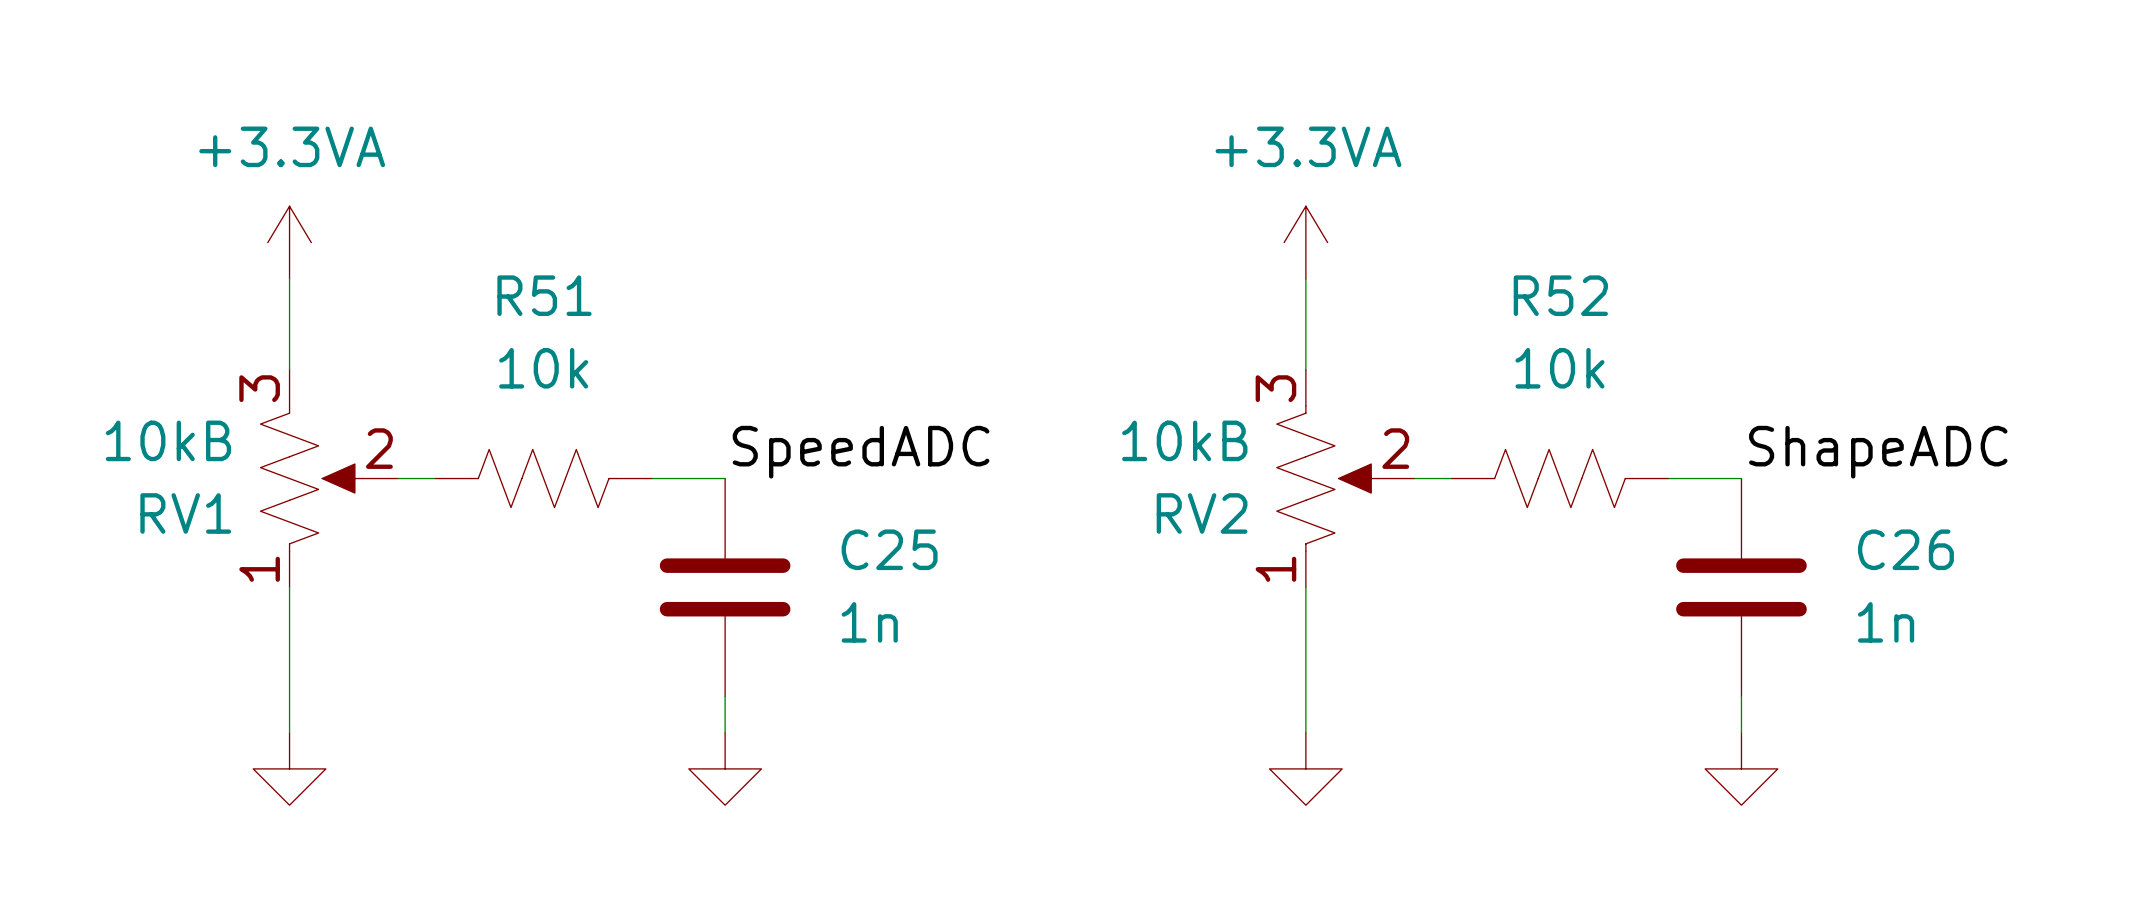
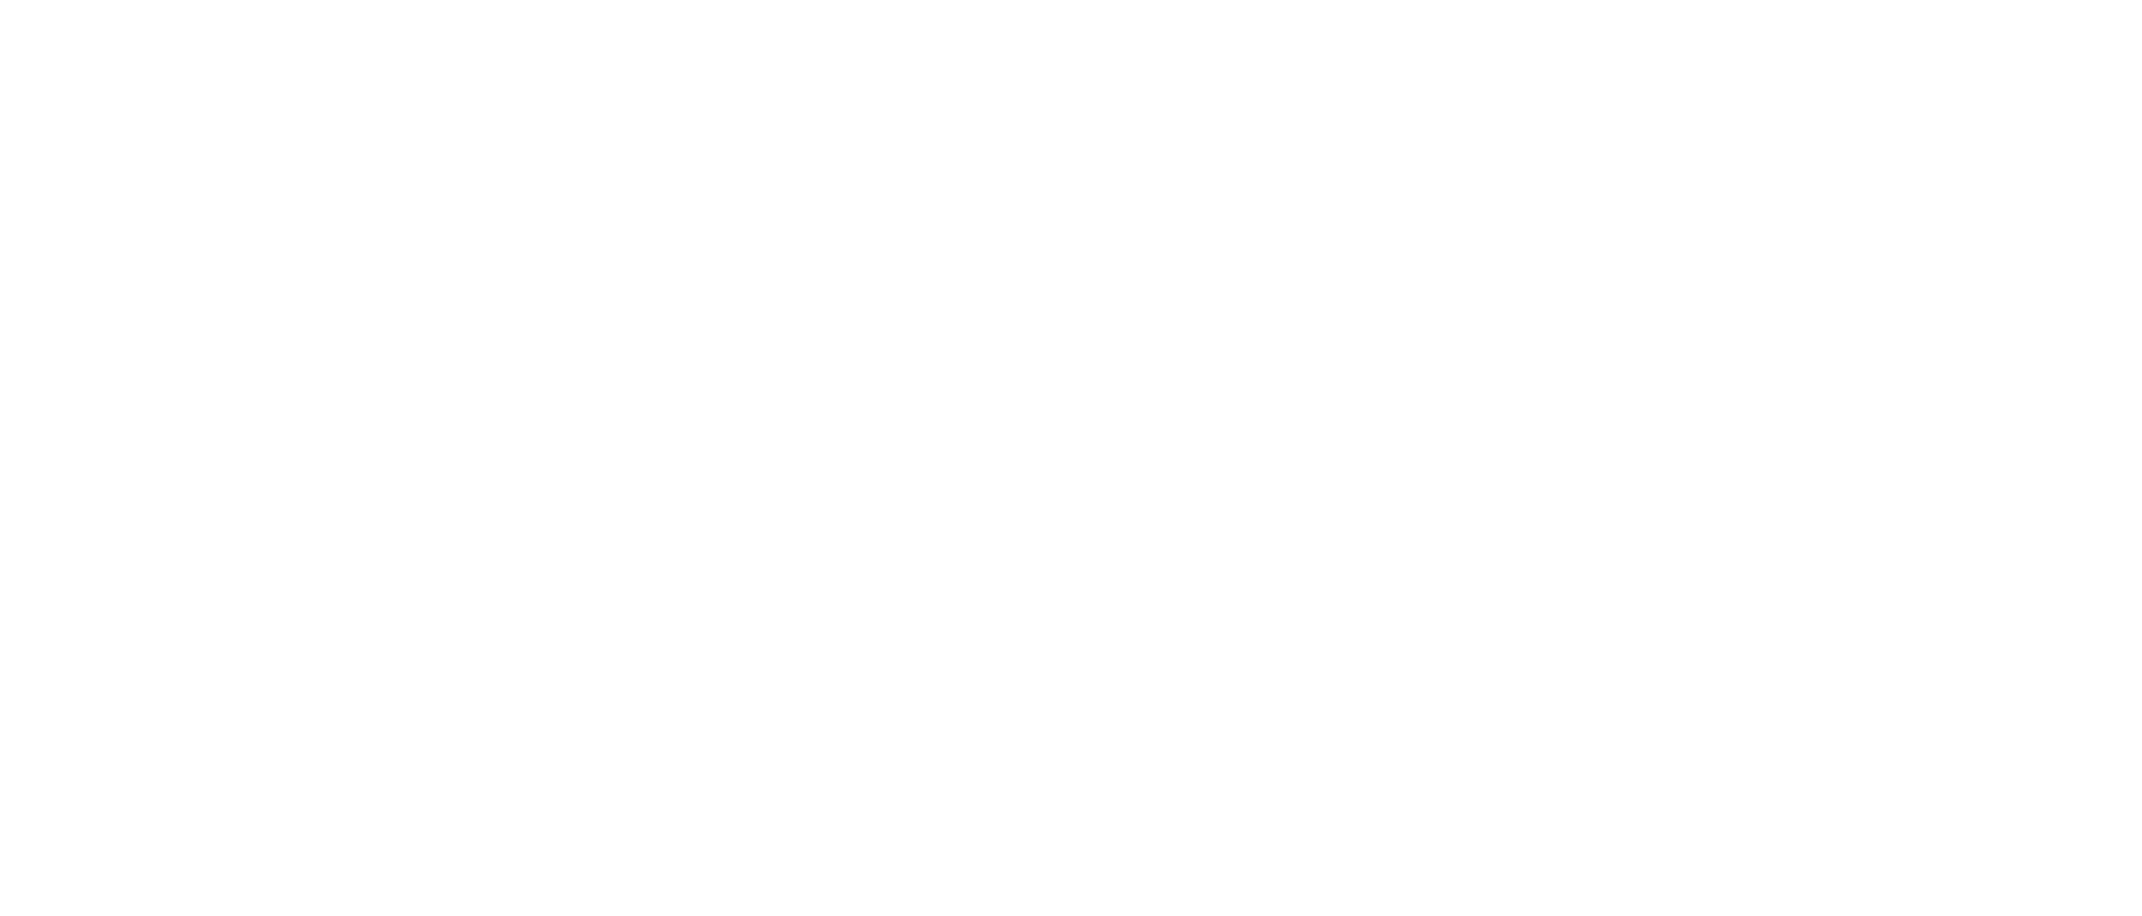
power symbol: +3.3VA (289, 242) -> none
power symbol: +3.3VA (1305, 242) -> none
wire: (289, 278) (289, 369) -> none
wire: (1305, 278) (1305, 369) -> none
label: SpeedADC (861, 452) -> none
label: ShapeADC (1878, 452) -> none
RV1: 10kB (329, 478) -> none
wire: (398, 478) (434, 478) -> none
R51: 10k (543, 478) -> none
wire: (652, 478) (725, 478) -> none
RV2: 10kB (1345, 478) -> none
wire: (1414, 478) (1451, 478) -> none
R52: 10k (1559, 478) -> none
wire: (1668, 478) (1741, 478) -> none
wire: (289, 587) (289, 732) -> none
C25: 1n (725, 587) -> none
wire: (1305, 587) (1305, 732) -> none
C26: 1n (1741, 587) -> none
wire: (725, 696) (725, 732) -> none
wire: (1741, 696) (1741, 732) -> none
power symbol: (289, 768) -> none
power symbol: (725, 768) -> none
power symbol: (1305, 768) -> none
power symbol: (1741, 768) -> none

